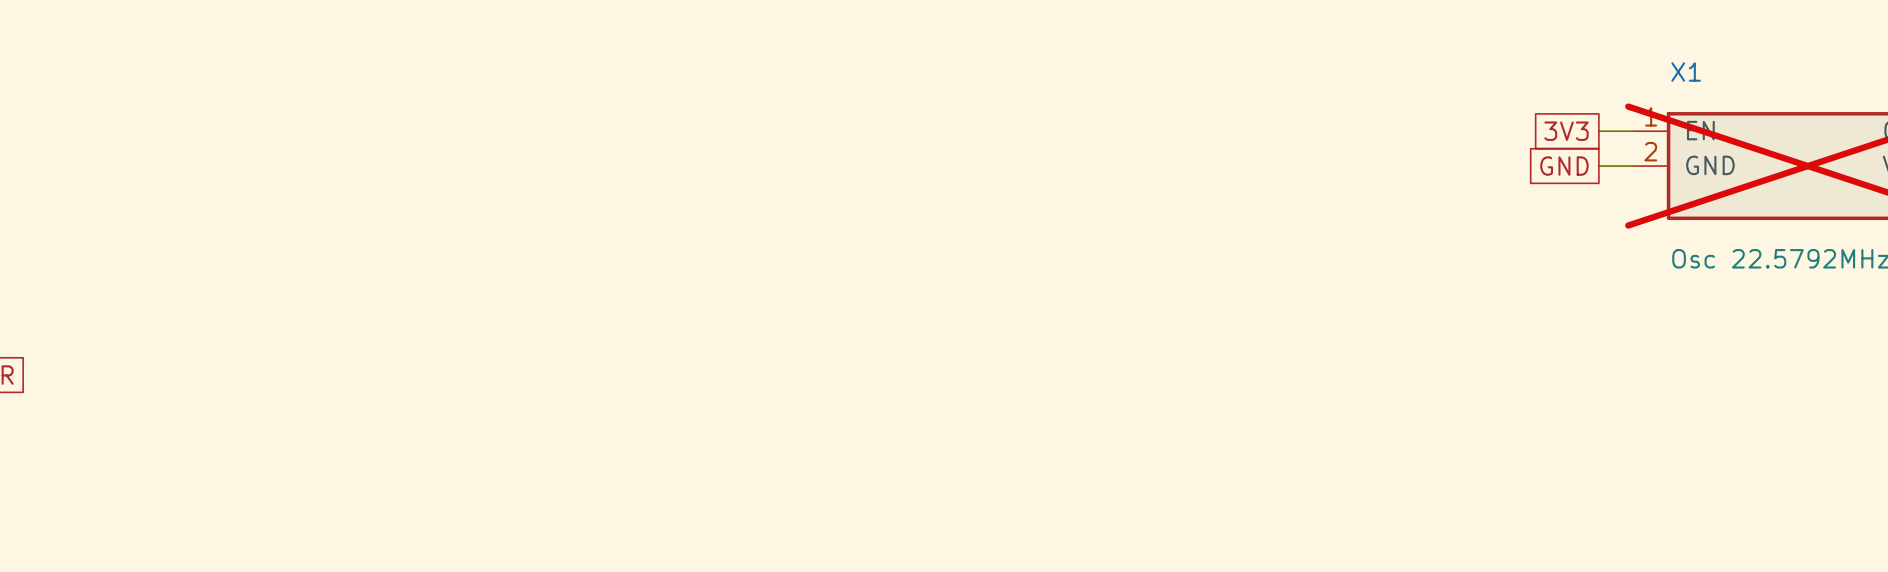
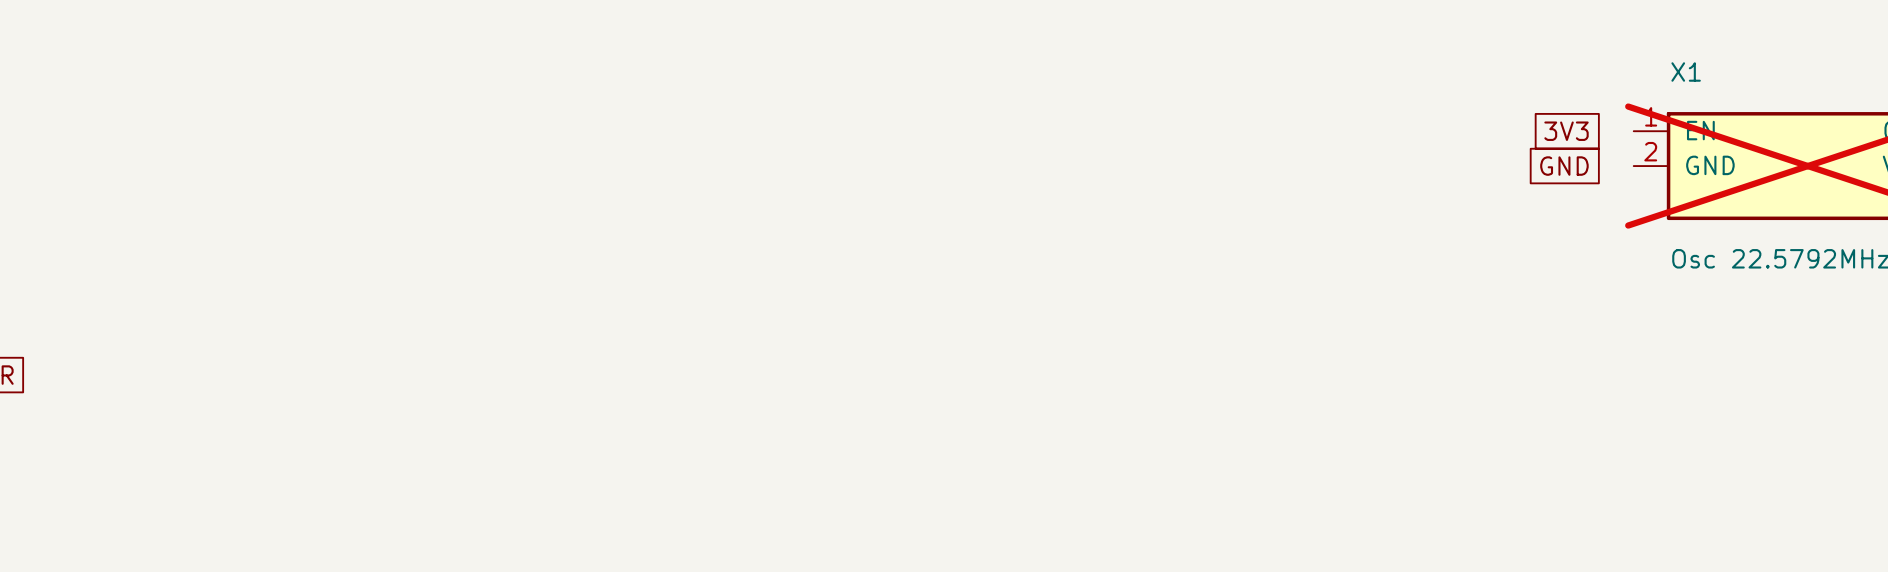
wire: (1598, 131) (1633, 131) -> none
wire: (1598, 166) (1633, 166) -> none

